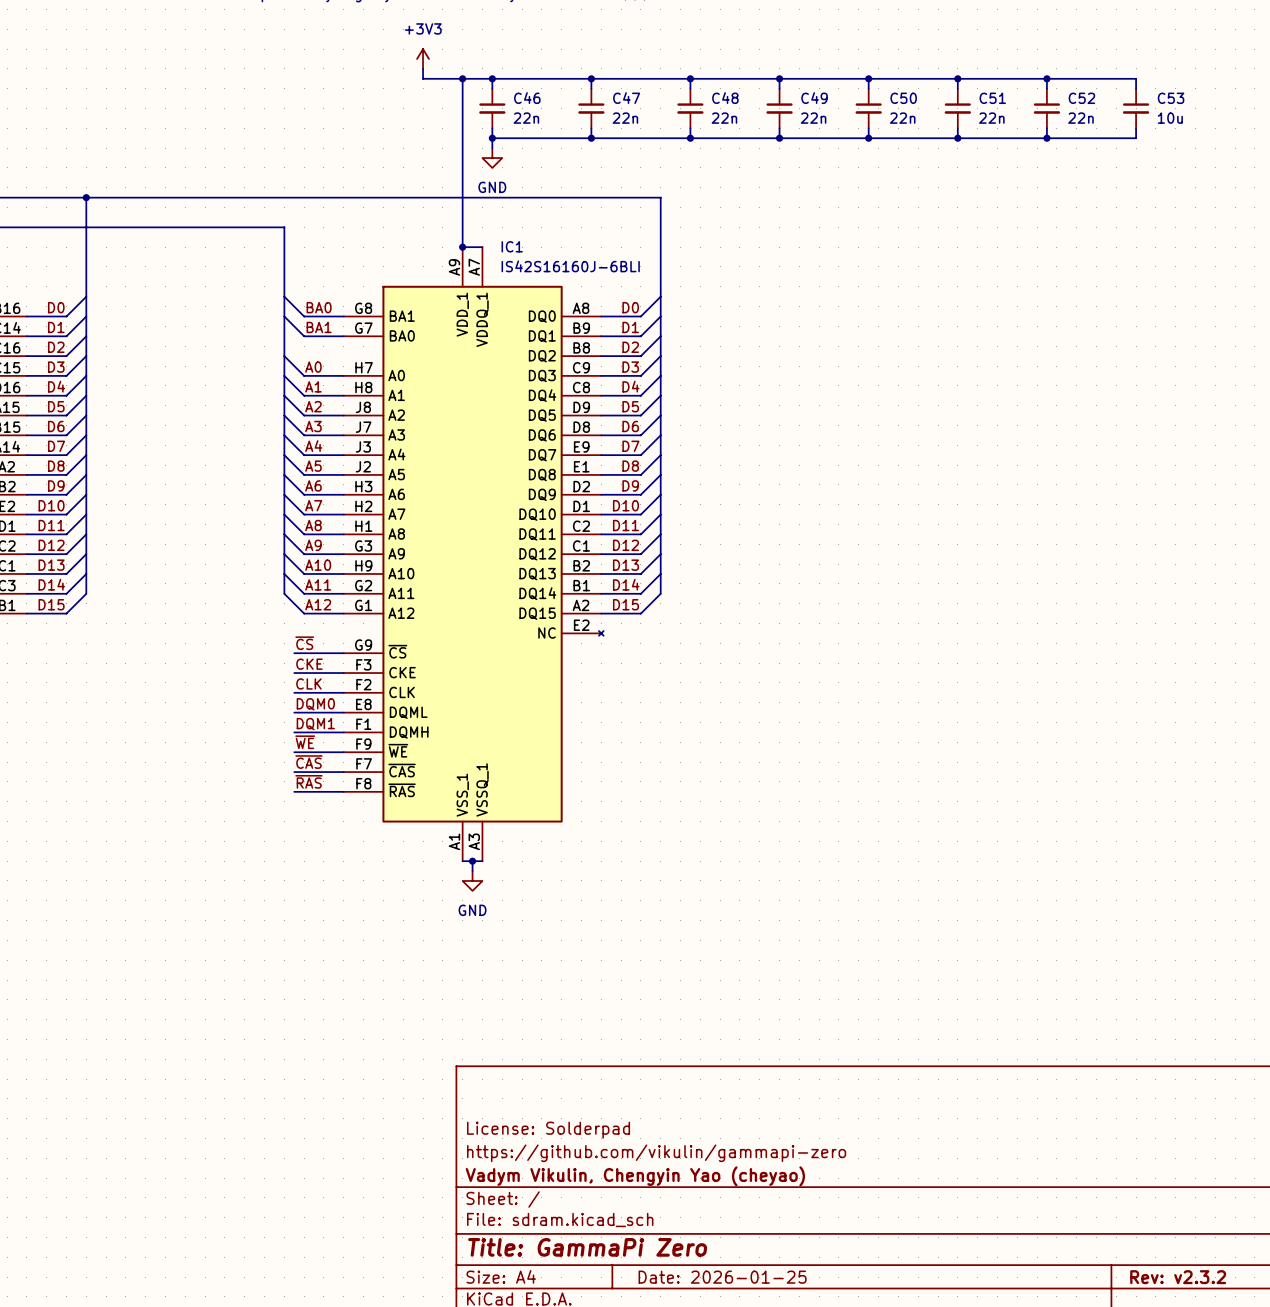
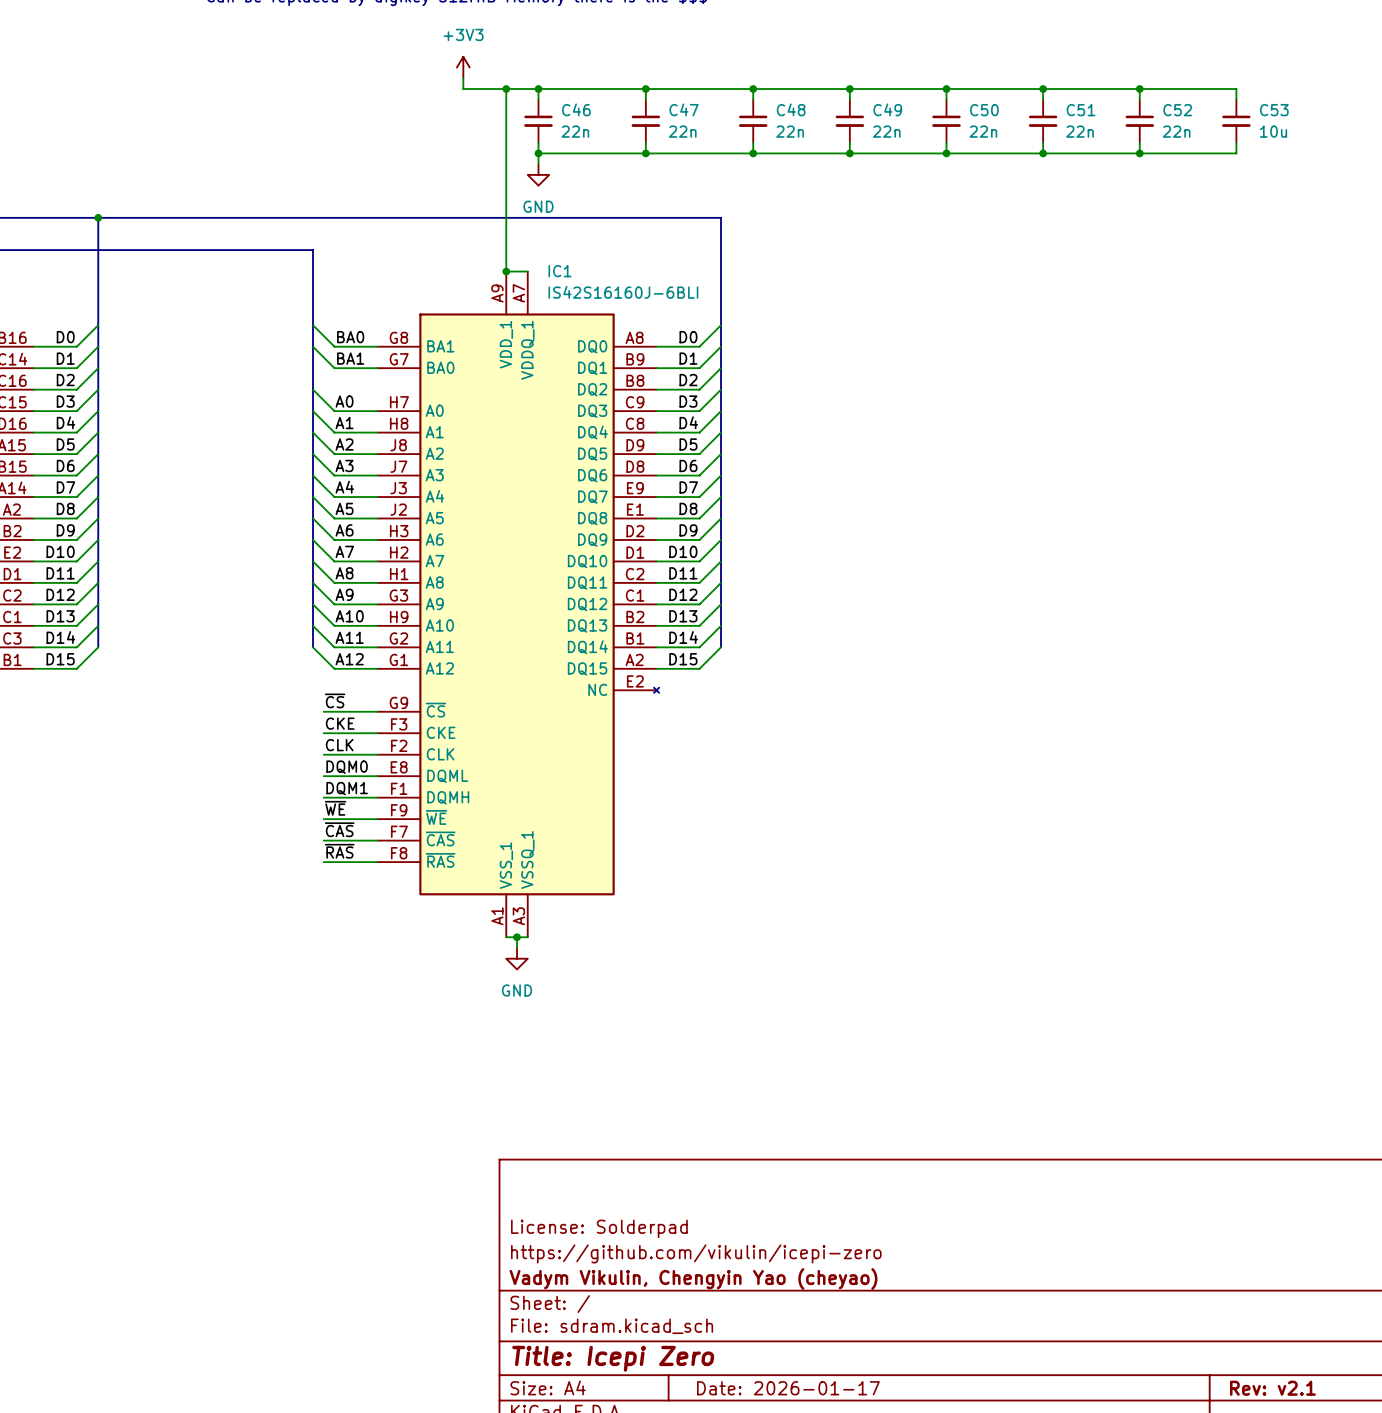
title block: https://github.com/vikulin/gammapi-zero (656, 1153) -> https://github.com/vikulin/icepi-zero (696, 1253)
title block: Title: GammaPi Zero (587, 1247) -> Title: Icepi Zero (613, 1358)
title block: Date: 2026-01-25 (722, 1277) -> Date: 2026-01-17 (788, 1388)
title block: Rev: v2.3.2 (1178, 1277) -> Rev: v2.1 (1272, 1388)

